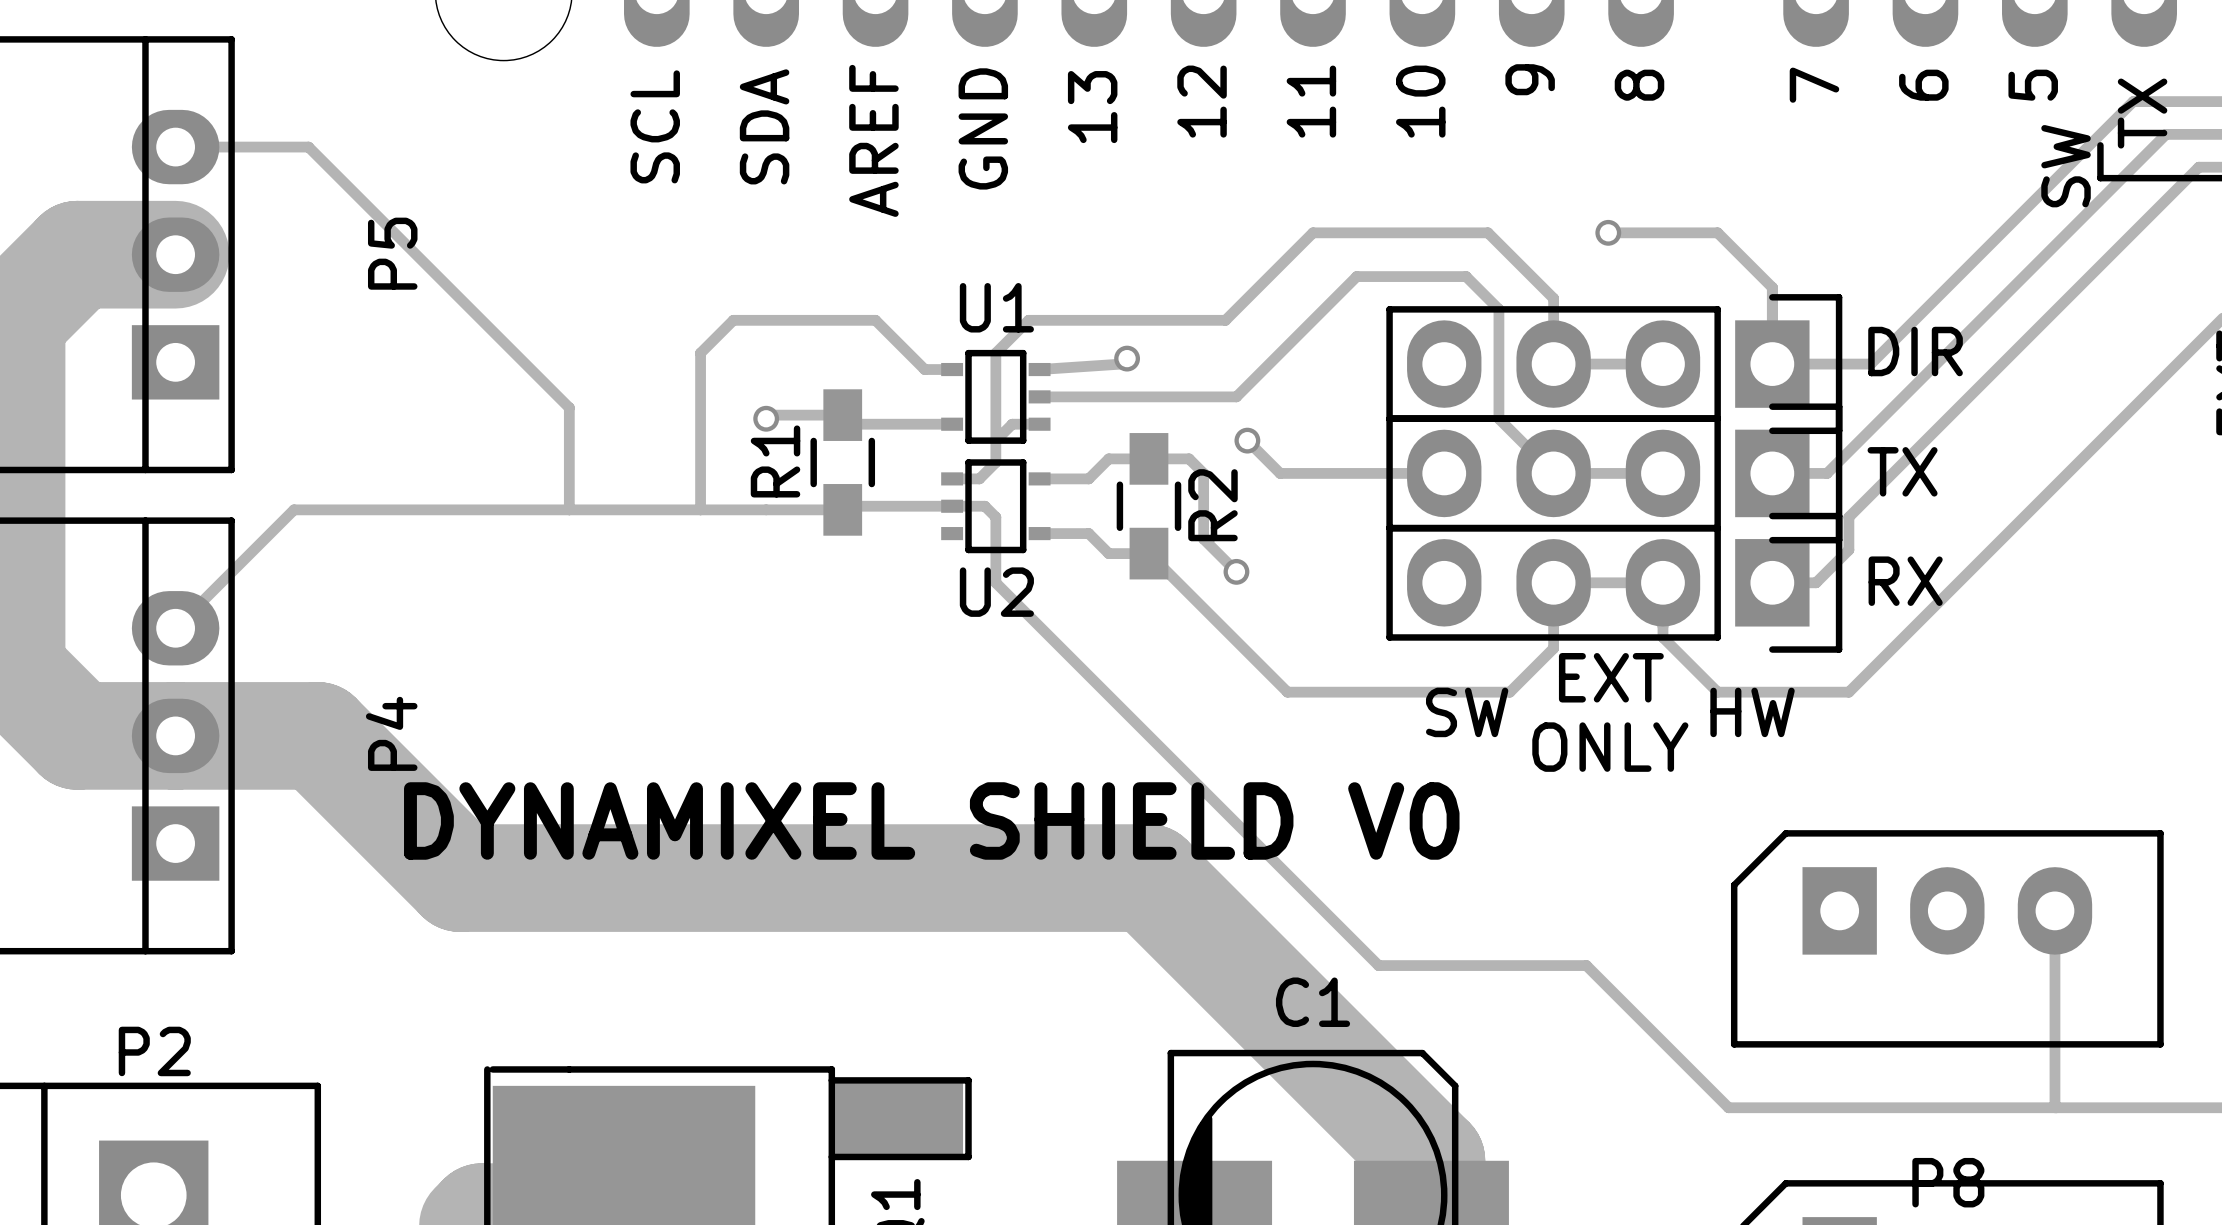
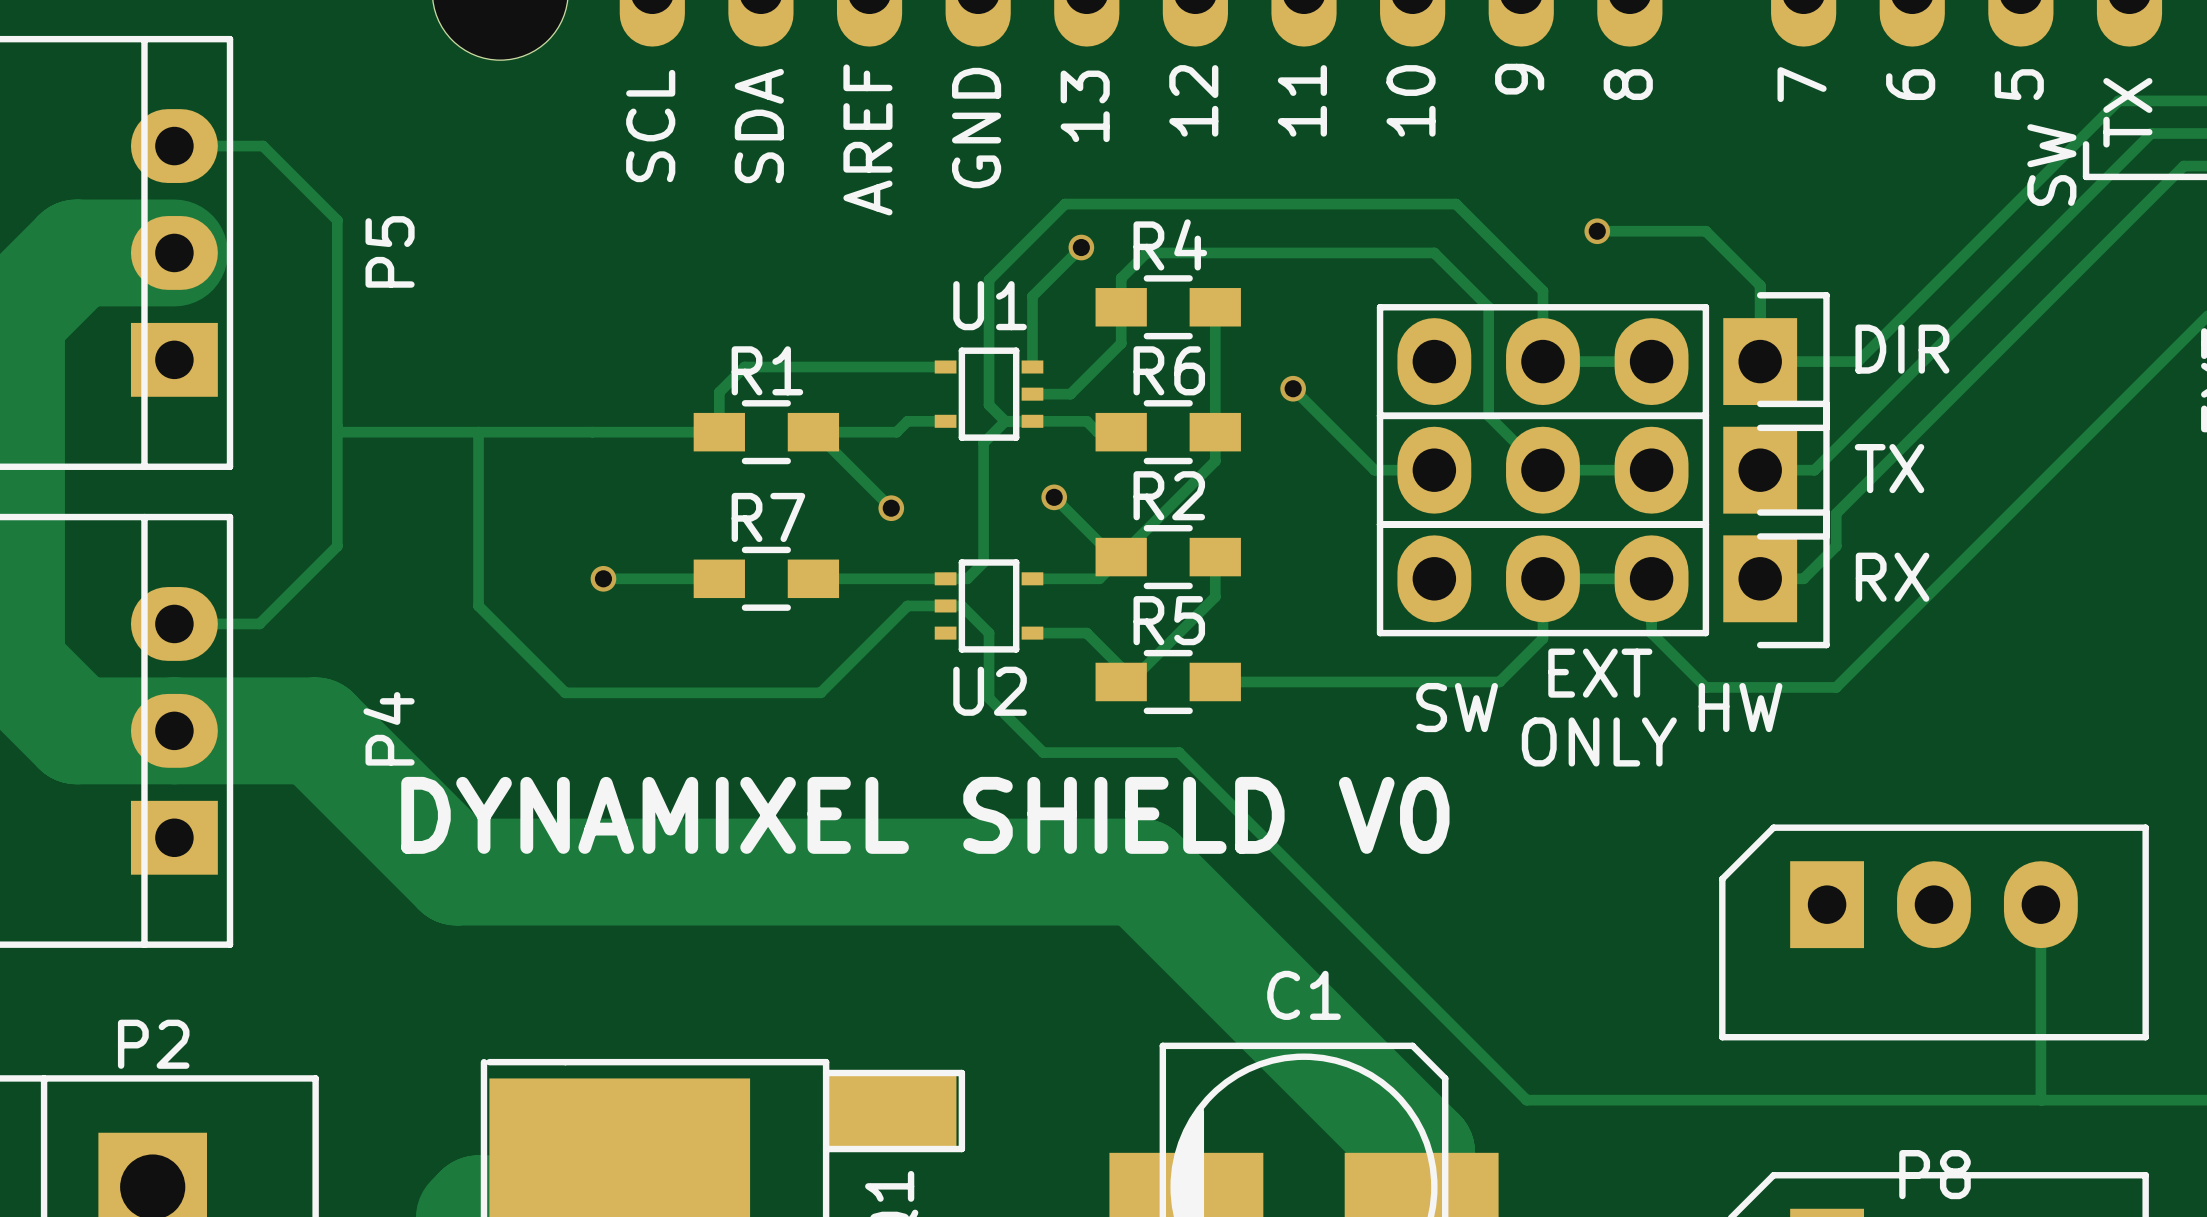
track: (264, 147) (308, 147) (569, 407) (569, 509) -> (263, 146) (337, 220) (337, 546) (259, 623) (174, 623)
via: none -> (1081, 247)
track: (1466, 276) (1356, 276) (1236, 396) (1077, 396) -> (1456, 274) (1434, 252) (1146, 252) (1121, 278) (1121, 343) (1070, 394)
track: (1553, 298) (1487, 232) (1313, 232) (1225, 320) (1028, 320) (995, 353) -> (1542, 296) (1542, 290) (1456, 204) (1065, 204) (989, 280) (989, 350)
R4: none -> (1168, 307)
track: none -> (1215, 307) (1215, 461) (1121, 557)
track: (1127, 358) (1121, 364) (1039, 369) -> (1081, 247) (1032, 296) (1032, 367)
via: (1127, 358) -> none
track: (924, 369) (875, 320) (733, 320) (700, 353) (700, 509) -> (918, 367) (744, 367) (719, 392) (719, 432) (337, 432)
track: (995, 407) (995, 462) (979, 478) (952, 478) -> (989, 405) (1005, 421)
track: (766, 418) (769, 415) (842, 415) (851, 424) (913, 424) -> (813, 432) (896, 432) (907, 421)
via: (766, 418) -> none
track: none -> (1032, 421) (1086, 421) (1097, 432) (1121, 432)
track: none -> (815, 432) (891, 508)
R6: none -> (1168, 432)
track: none -> (989, 437) (983, 443) (983, 562) (967, 578) (813, 578)
track: (1247, 440) (1280, 473) (1384, 473) -> (1293, 388) (1374, 470)
via position: (1247, 440) -> (1293, 388)
R1 rotation: 0° (842, 462) -> 90° clockwise (766, 432)
track: (1039, 478) (1088, 478) (1108, 458) (1189, 458) (1203, 473) (1203, 539) (1236, 571) -> none
track: none -> (1054, 497) (1113, 557) (1121, 557)
via: none -> (1054, 497)
R2 name position: R2 (1212, 505) -> R2 (1169, 495)
U2 position: (995, 506) -> (989, 605)
R2 rotation: 0° (1148, 506) -> 90° clockwise (1168, 557)
via: none -> (891, 508)
track: (1039, 533) (1088, 533) (1108, 553) (1148, 553) (1287, 692) (1509, 692) (1553, 648) (1553, 642) -> (1215, 681) (1499, 681) (1542, 638)
track: none -> (1121, 557) (1099, 578) (1032, 578)
track: none -> (1215, 557) (1215, 596) (1130, 681) (1121, 681) (1121, 667) (1086, 633) (1032, 633)
via: (1236, 571) -> none
track: none -> (603, 578) (719, 578)
via: none -> (603, 578)
R7: none -> (766, 578)
track: (175, 628) (294, 509) (842, 509) (846, 506) (984, 506) (995, 517) (995, 582) (1378, 965) (1586, 965) (1728, 1107) -> (478, 432) (478, 605) (565, 692) (820, 692) (907, 605) (961, 605) (989, 633) (989, 698) (1043, 752) (1179, 752) (1526, 1100) (1716, 1100)
R5: none -> (1168, 681)

